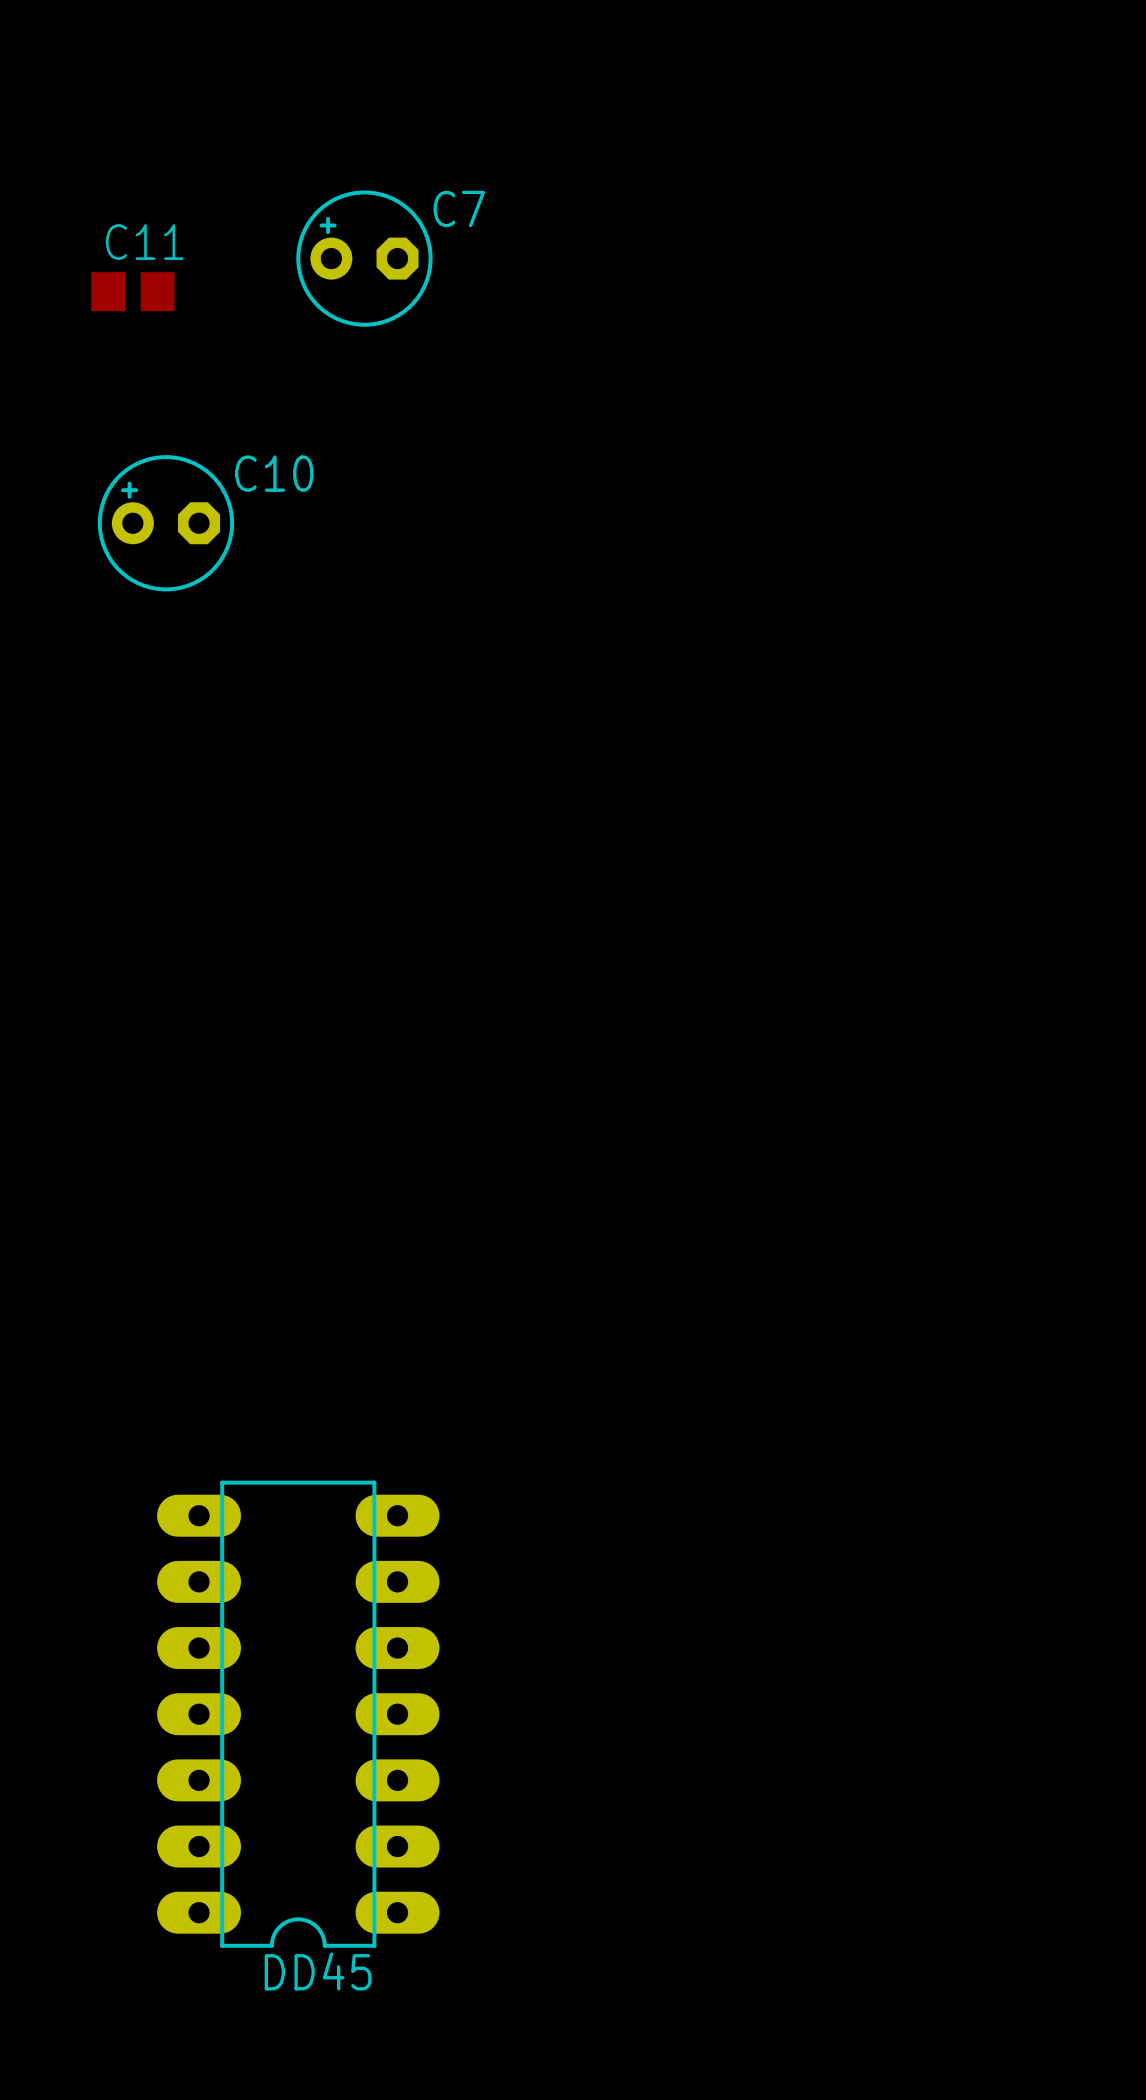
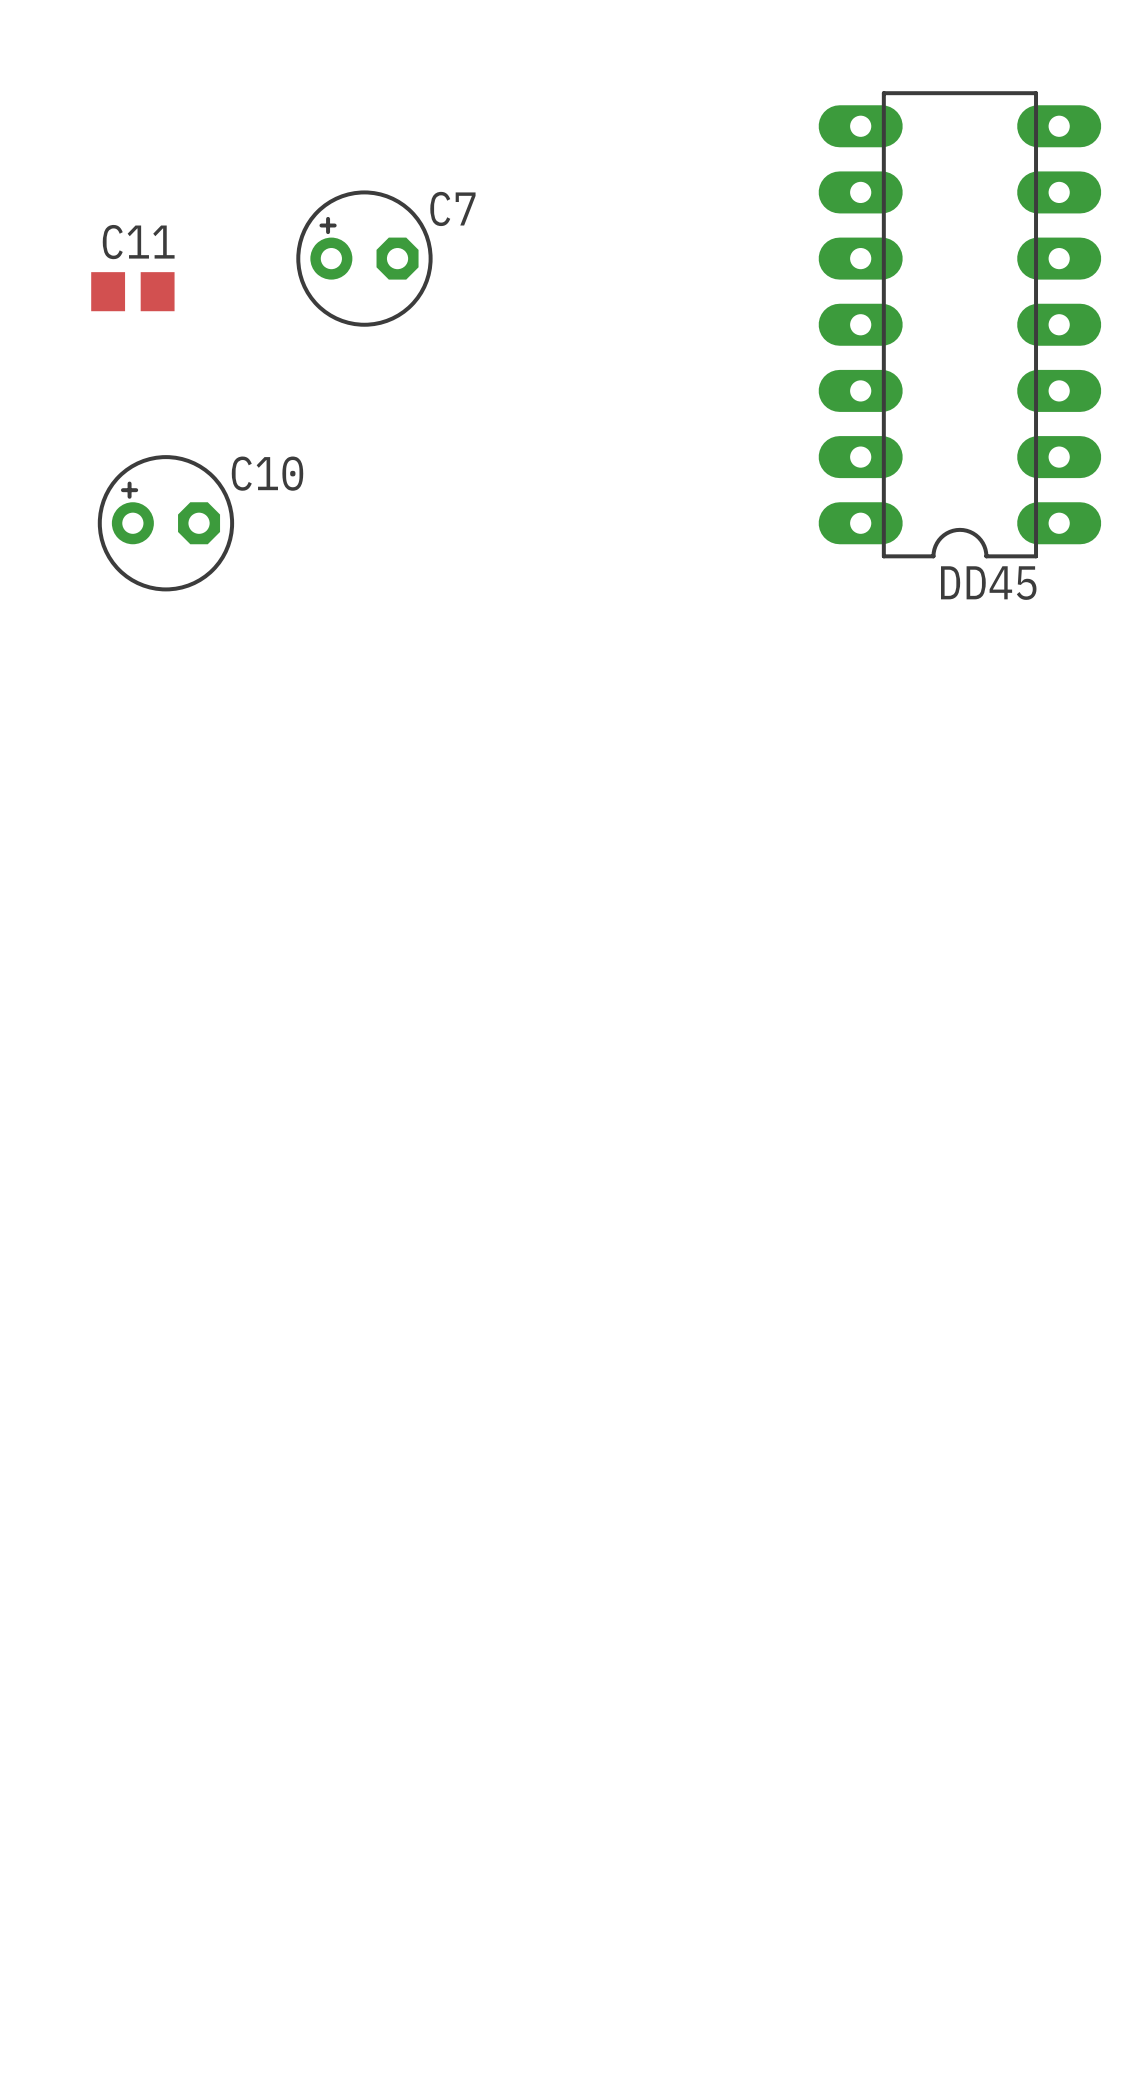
DD45 position: (298, 1714) -> (959, 324)

